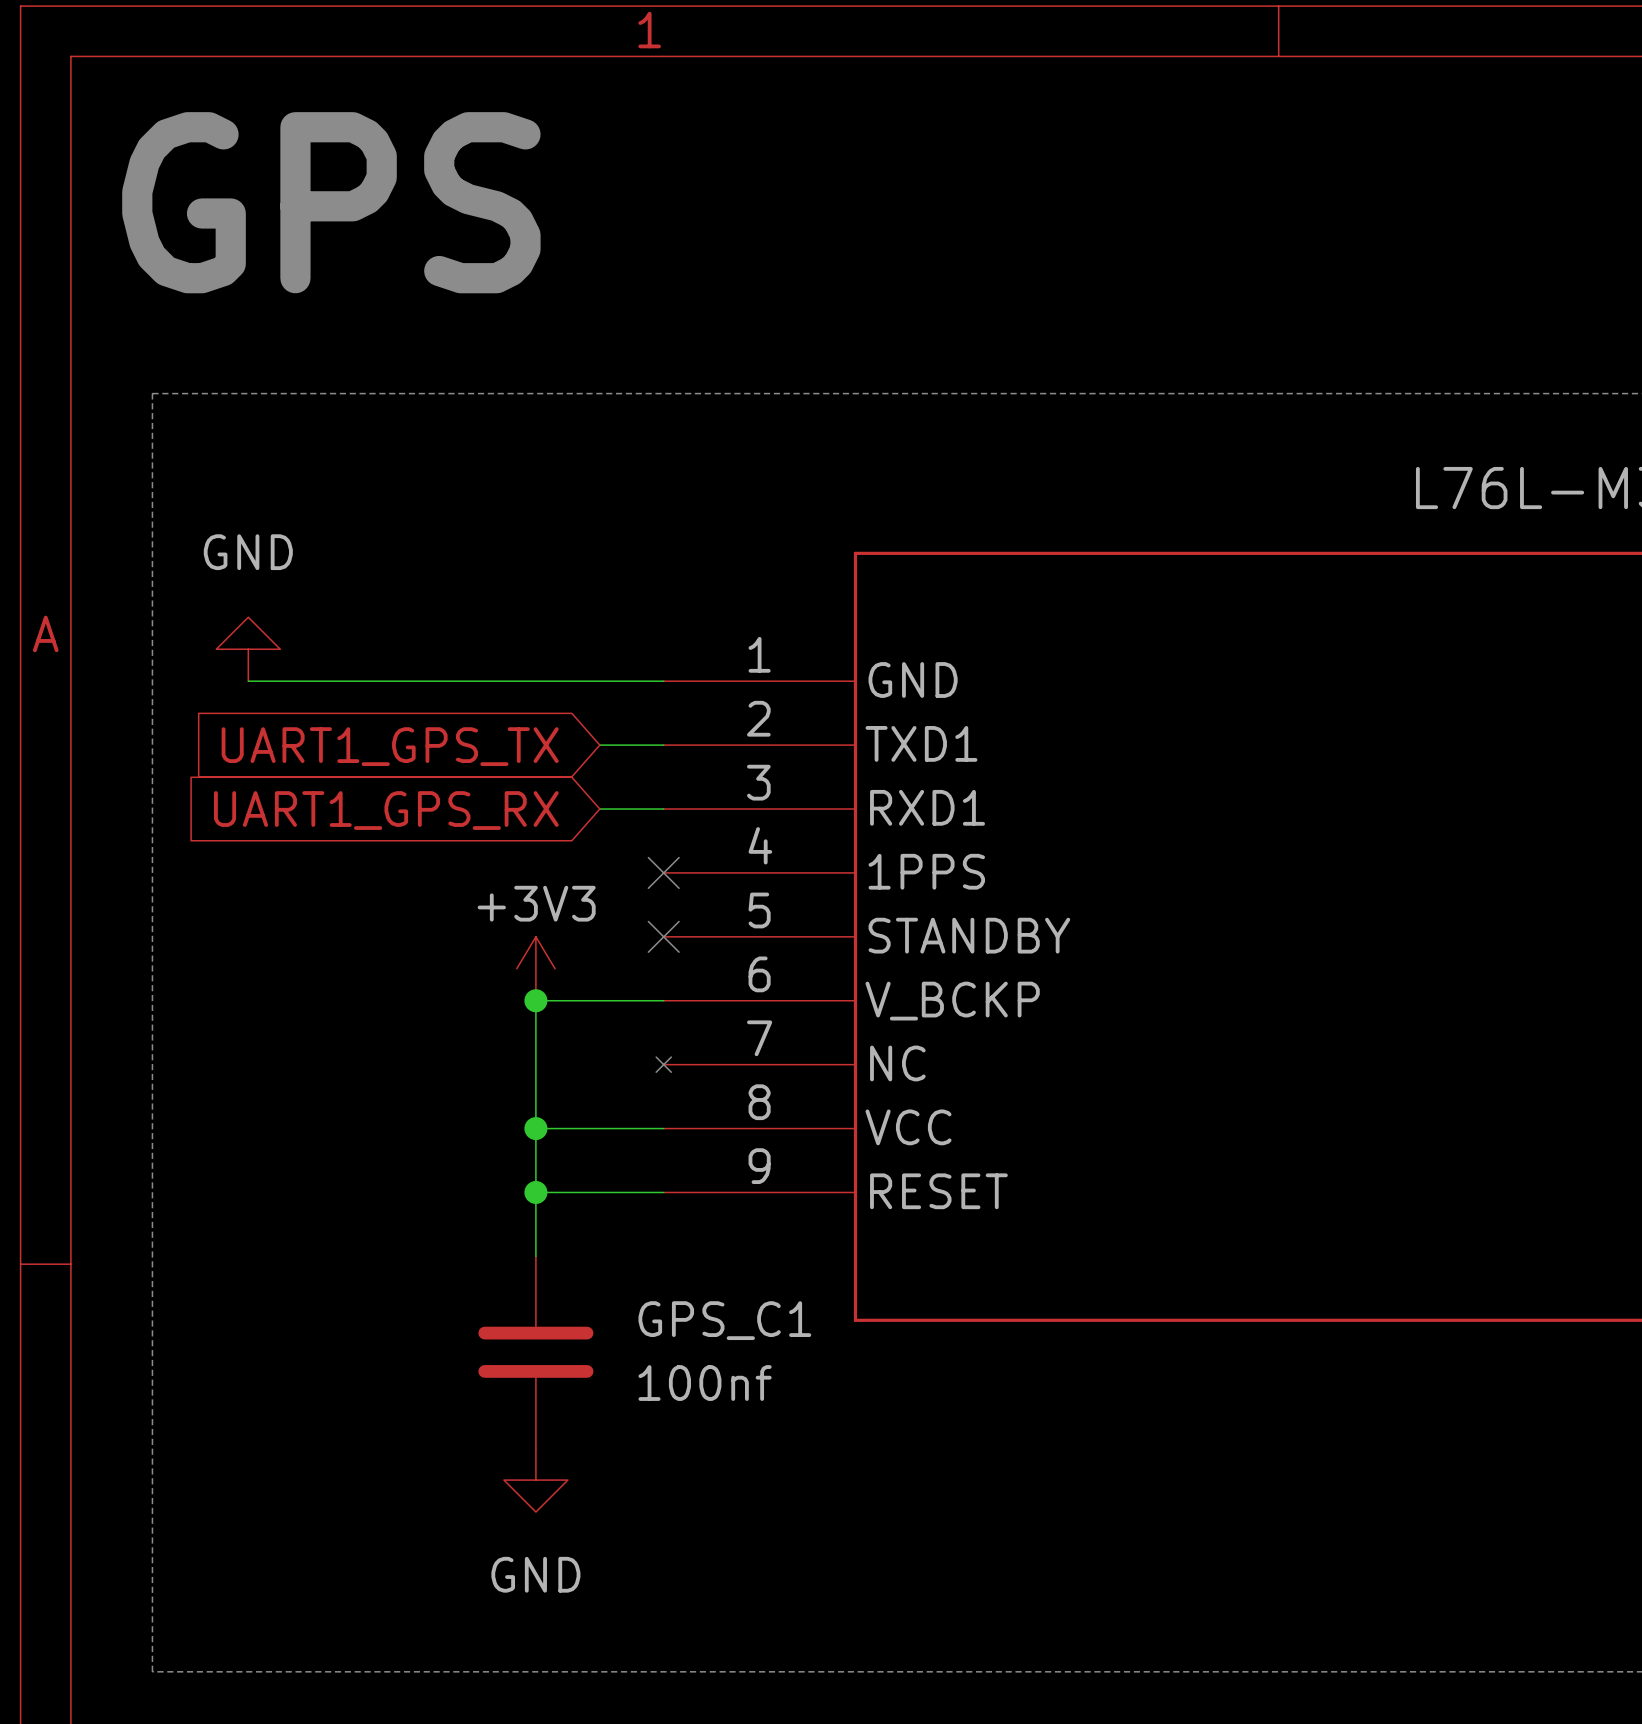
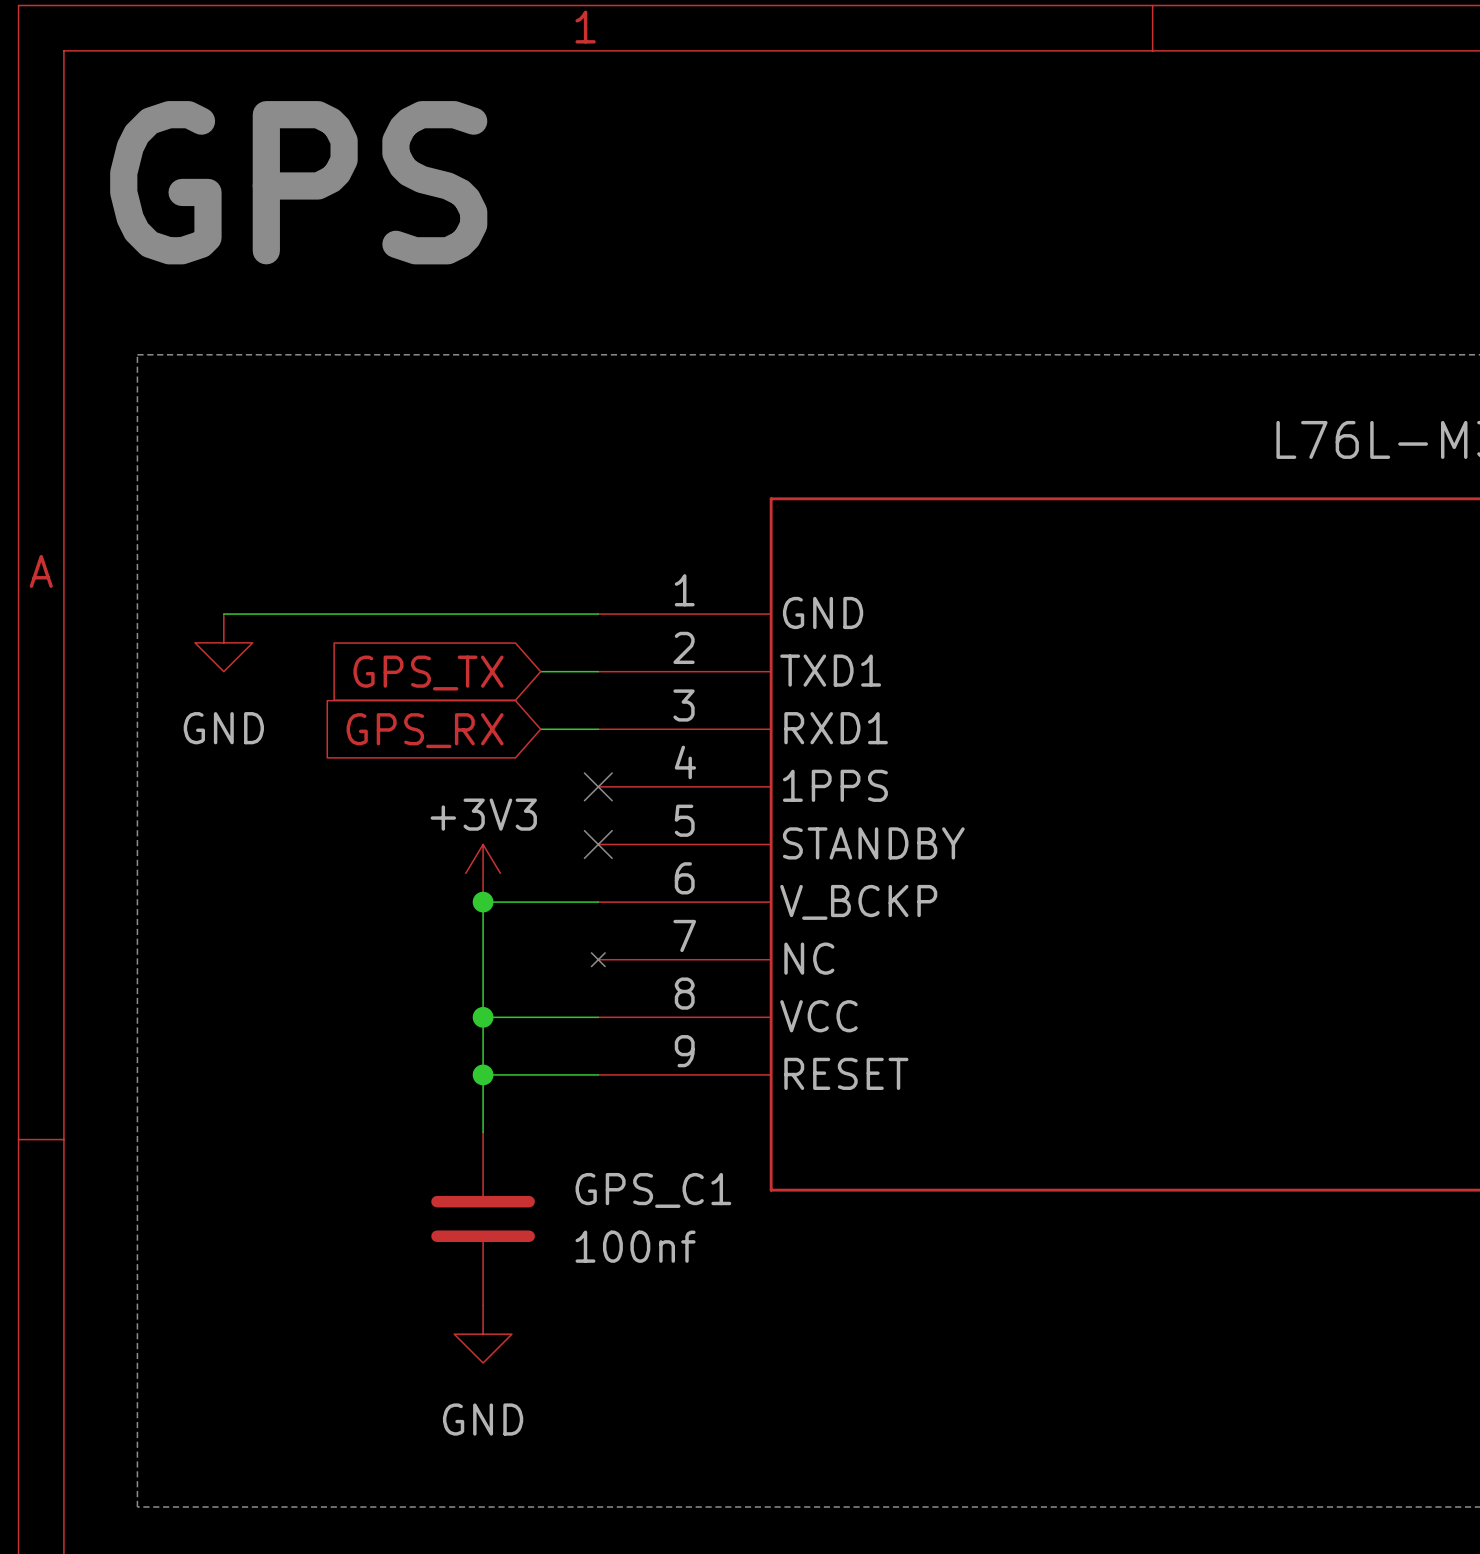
power symbol rotation: 0° (248, 649) -> 180° (223, 642)
power symbol position: GND (248, 649) -> GND (223, 642)
global label: UART1_GPS_TX (390, 746) -> GPS_TX (428, 673)
global label: UART1_GPS_RX (386, 810) -> GPS_RX (425, 730)

